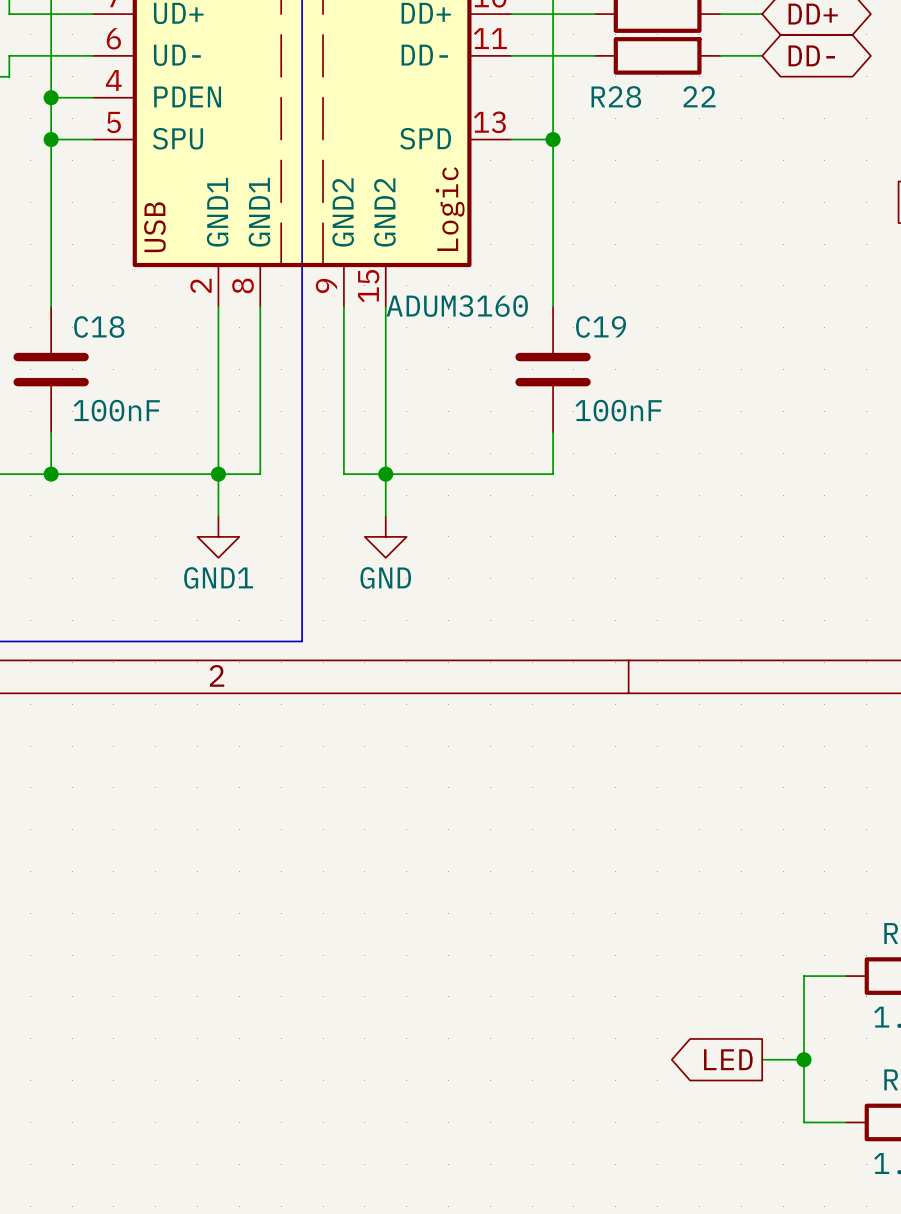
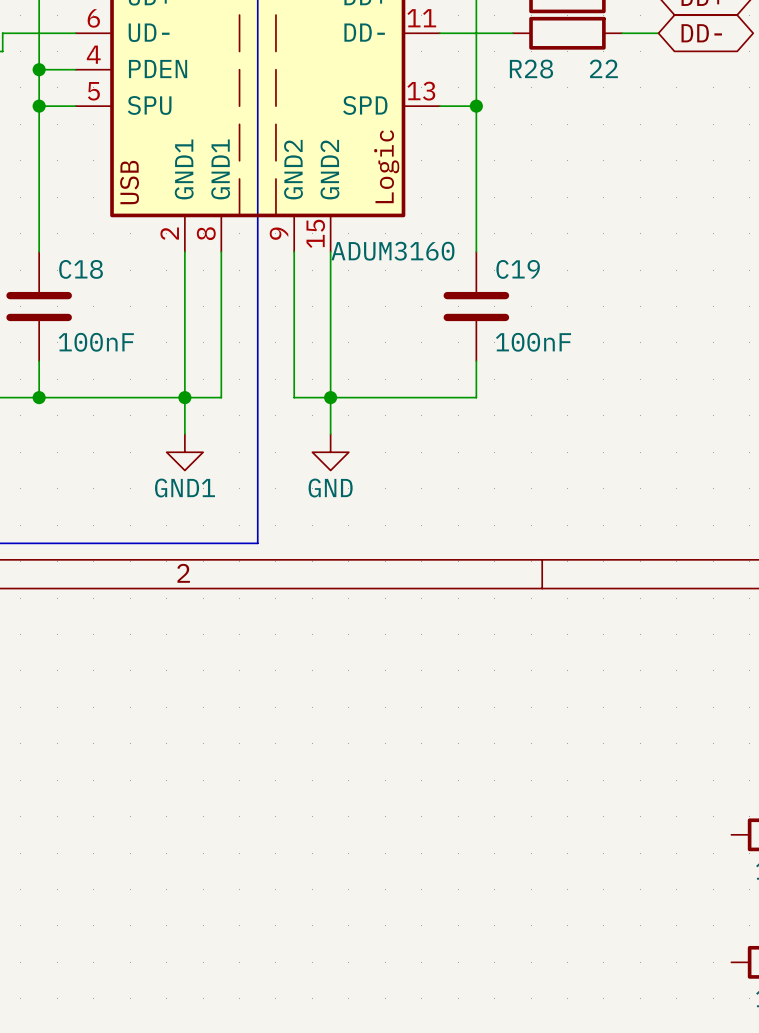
wire: (845, 976) (804, 976) (804, 1122) (845, 1122) -> none
global label: LED (728, 1059) -> none
wire: (762, 1059) (804, 1059) -> none
junction: (804, 1059) -> none

